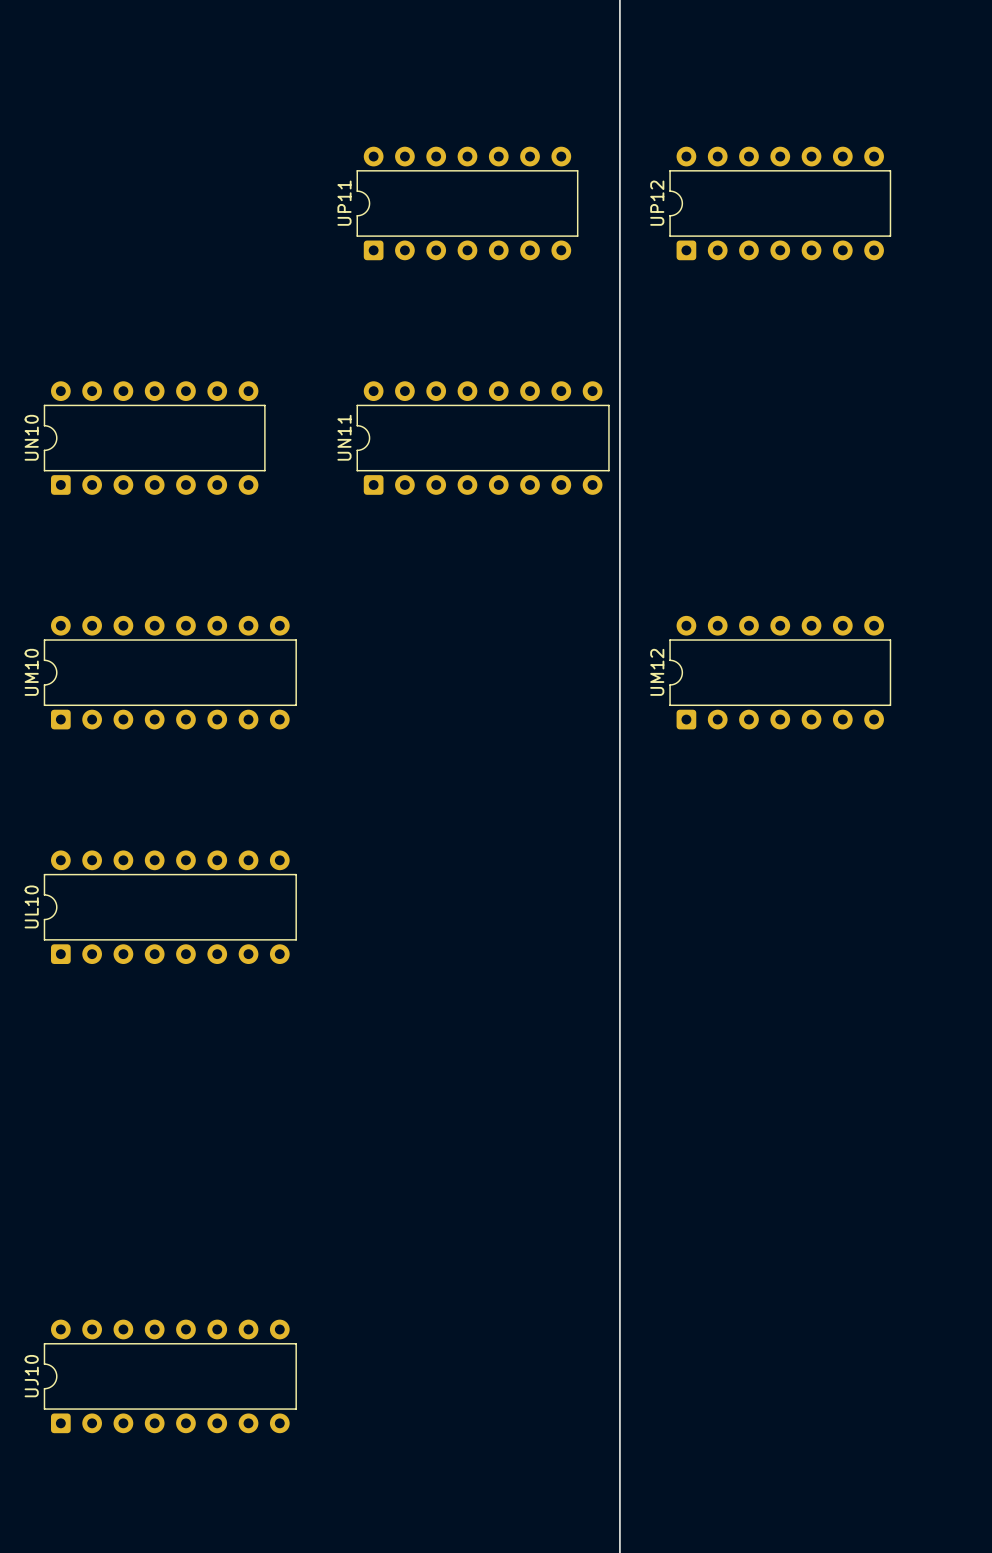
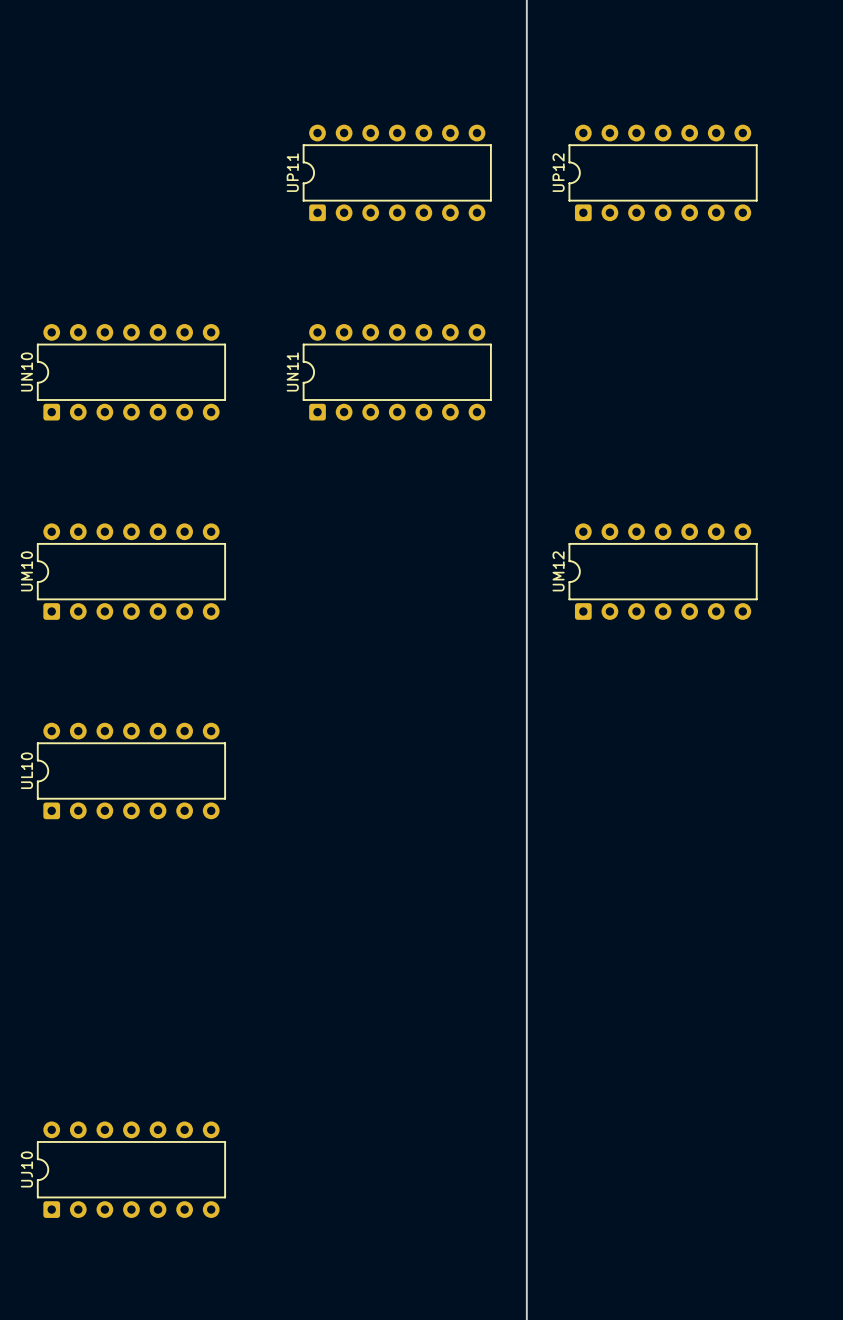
UN11 footprint: [356, 381, 610, 495] -> [302, 324, 492, 421]
UM10 footprint: [43, 615, 297, 730] -> [37, 523, 226, 620]
UL10 footprint: [43, 850, 297, 965] -> [37, 722, 226, 820]
UJ10 footprint: [43, 1319, 297, 1434] -> [37, 1121, 226, 1218]

